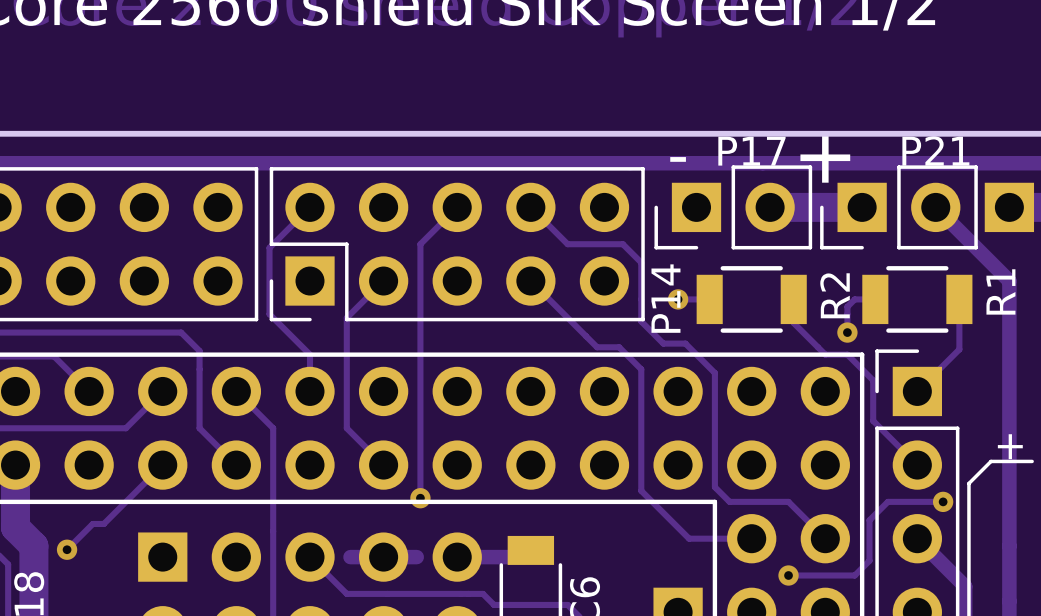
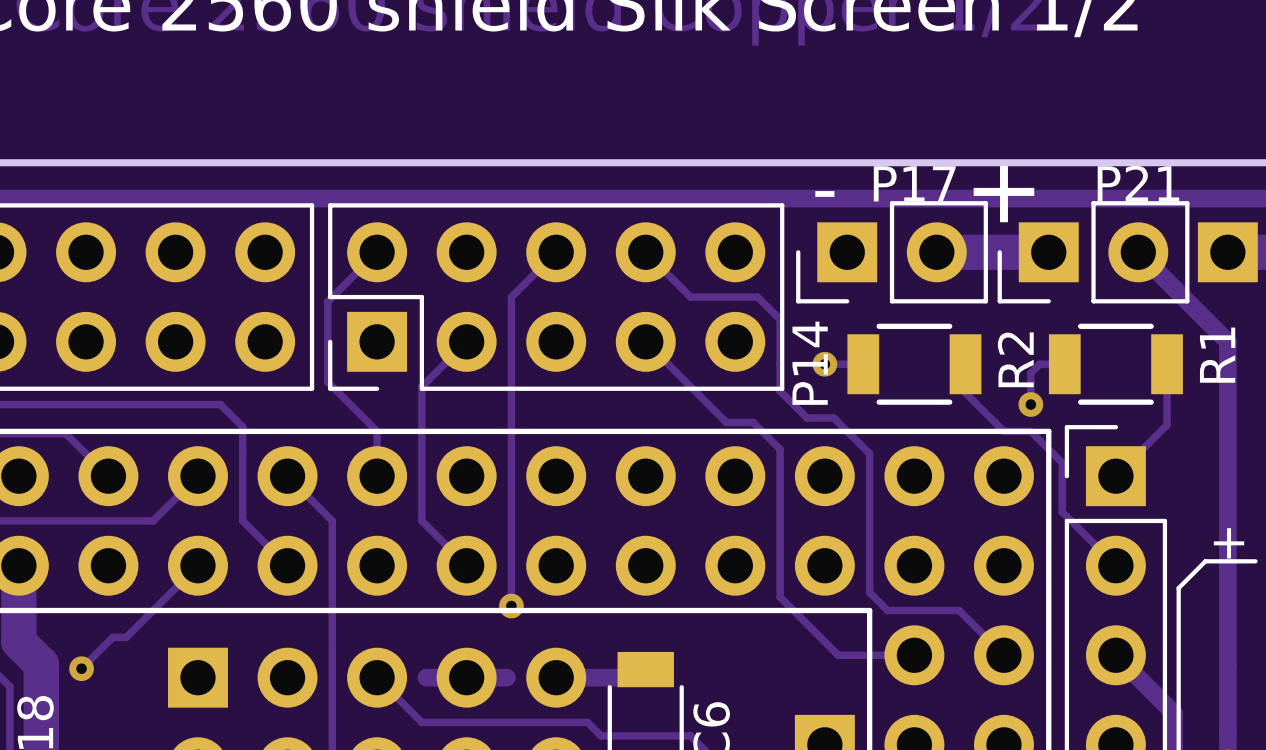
track: (943, 501) (887, 501) (869, 520) (869, 560) (854, 575) (788, 575) -> none
via: (943, 501) -> none
via: (788, 575) -> none

